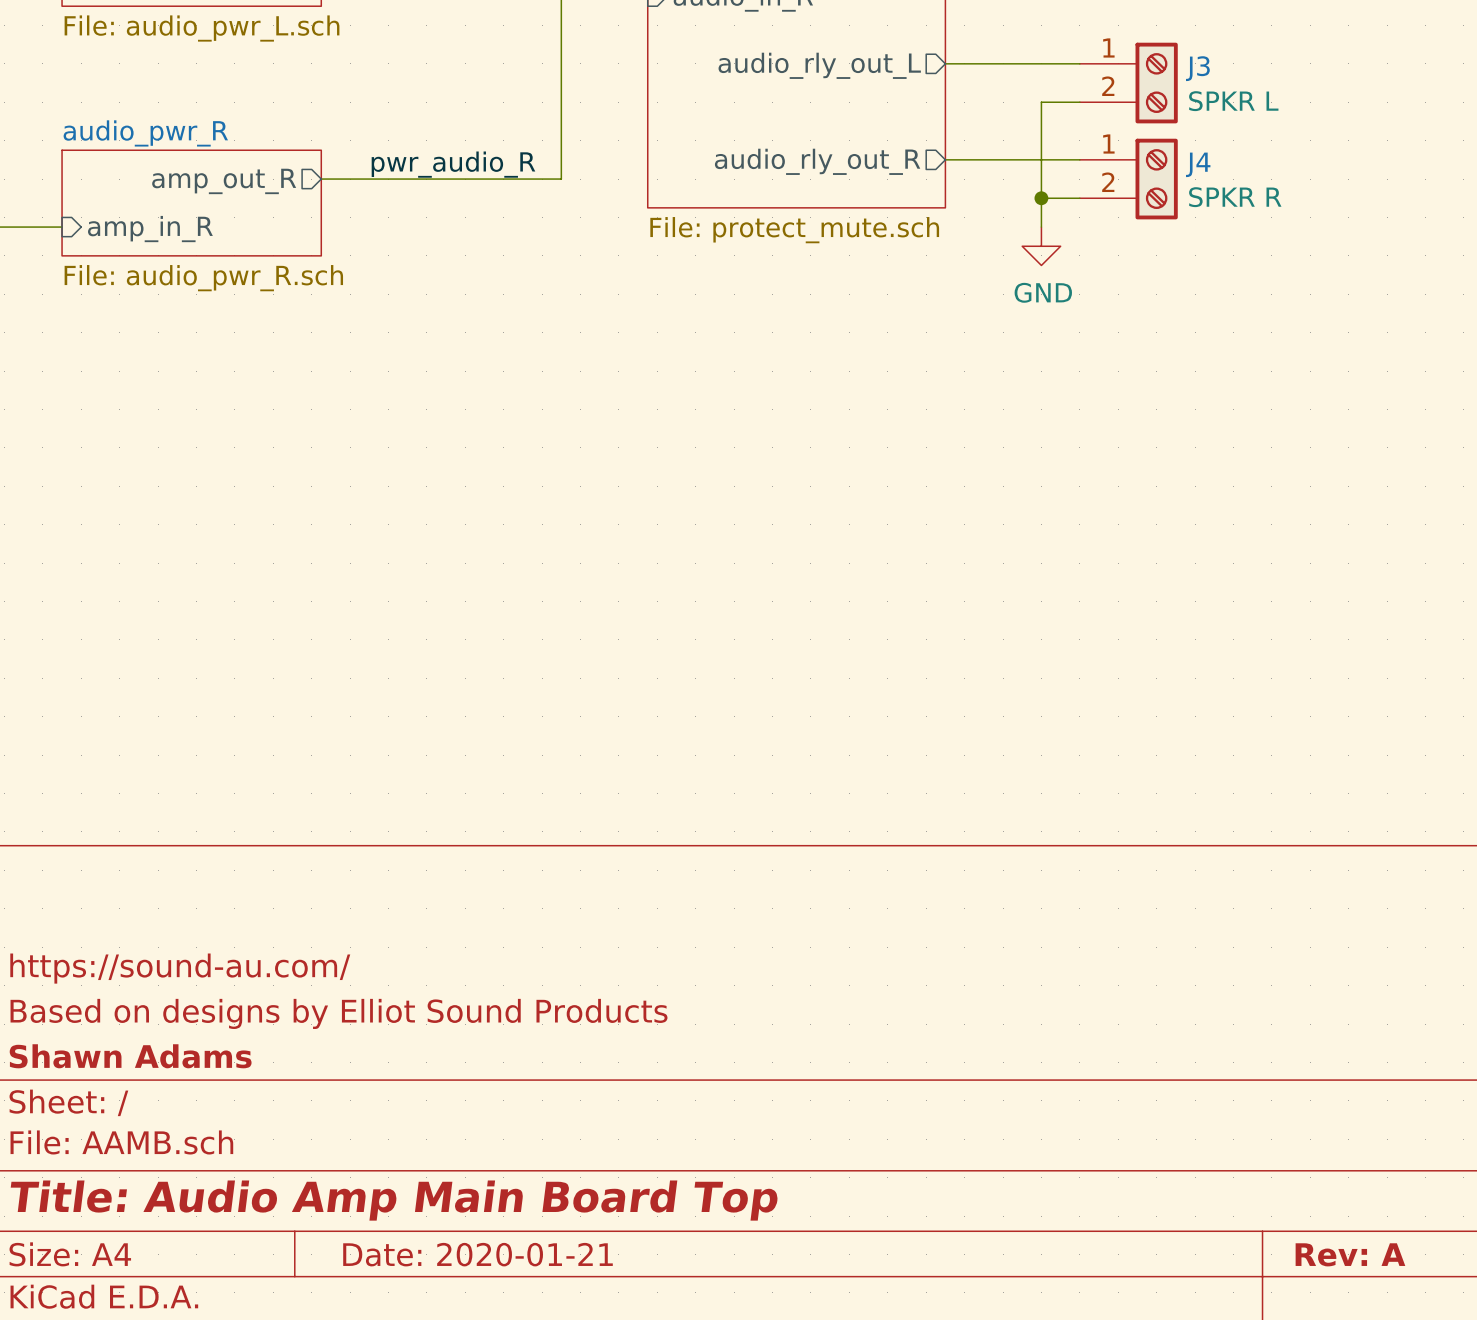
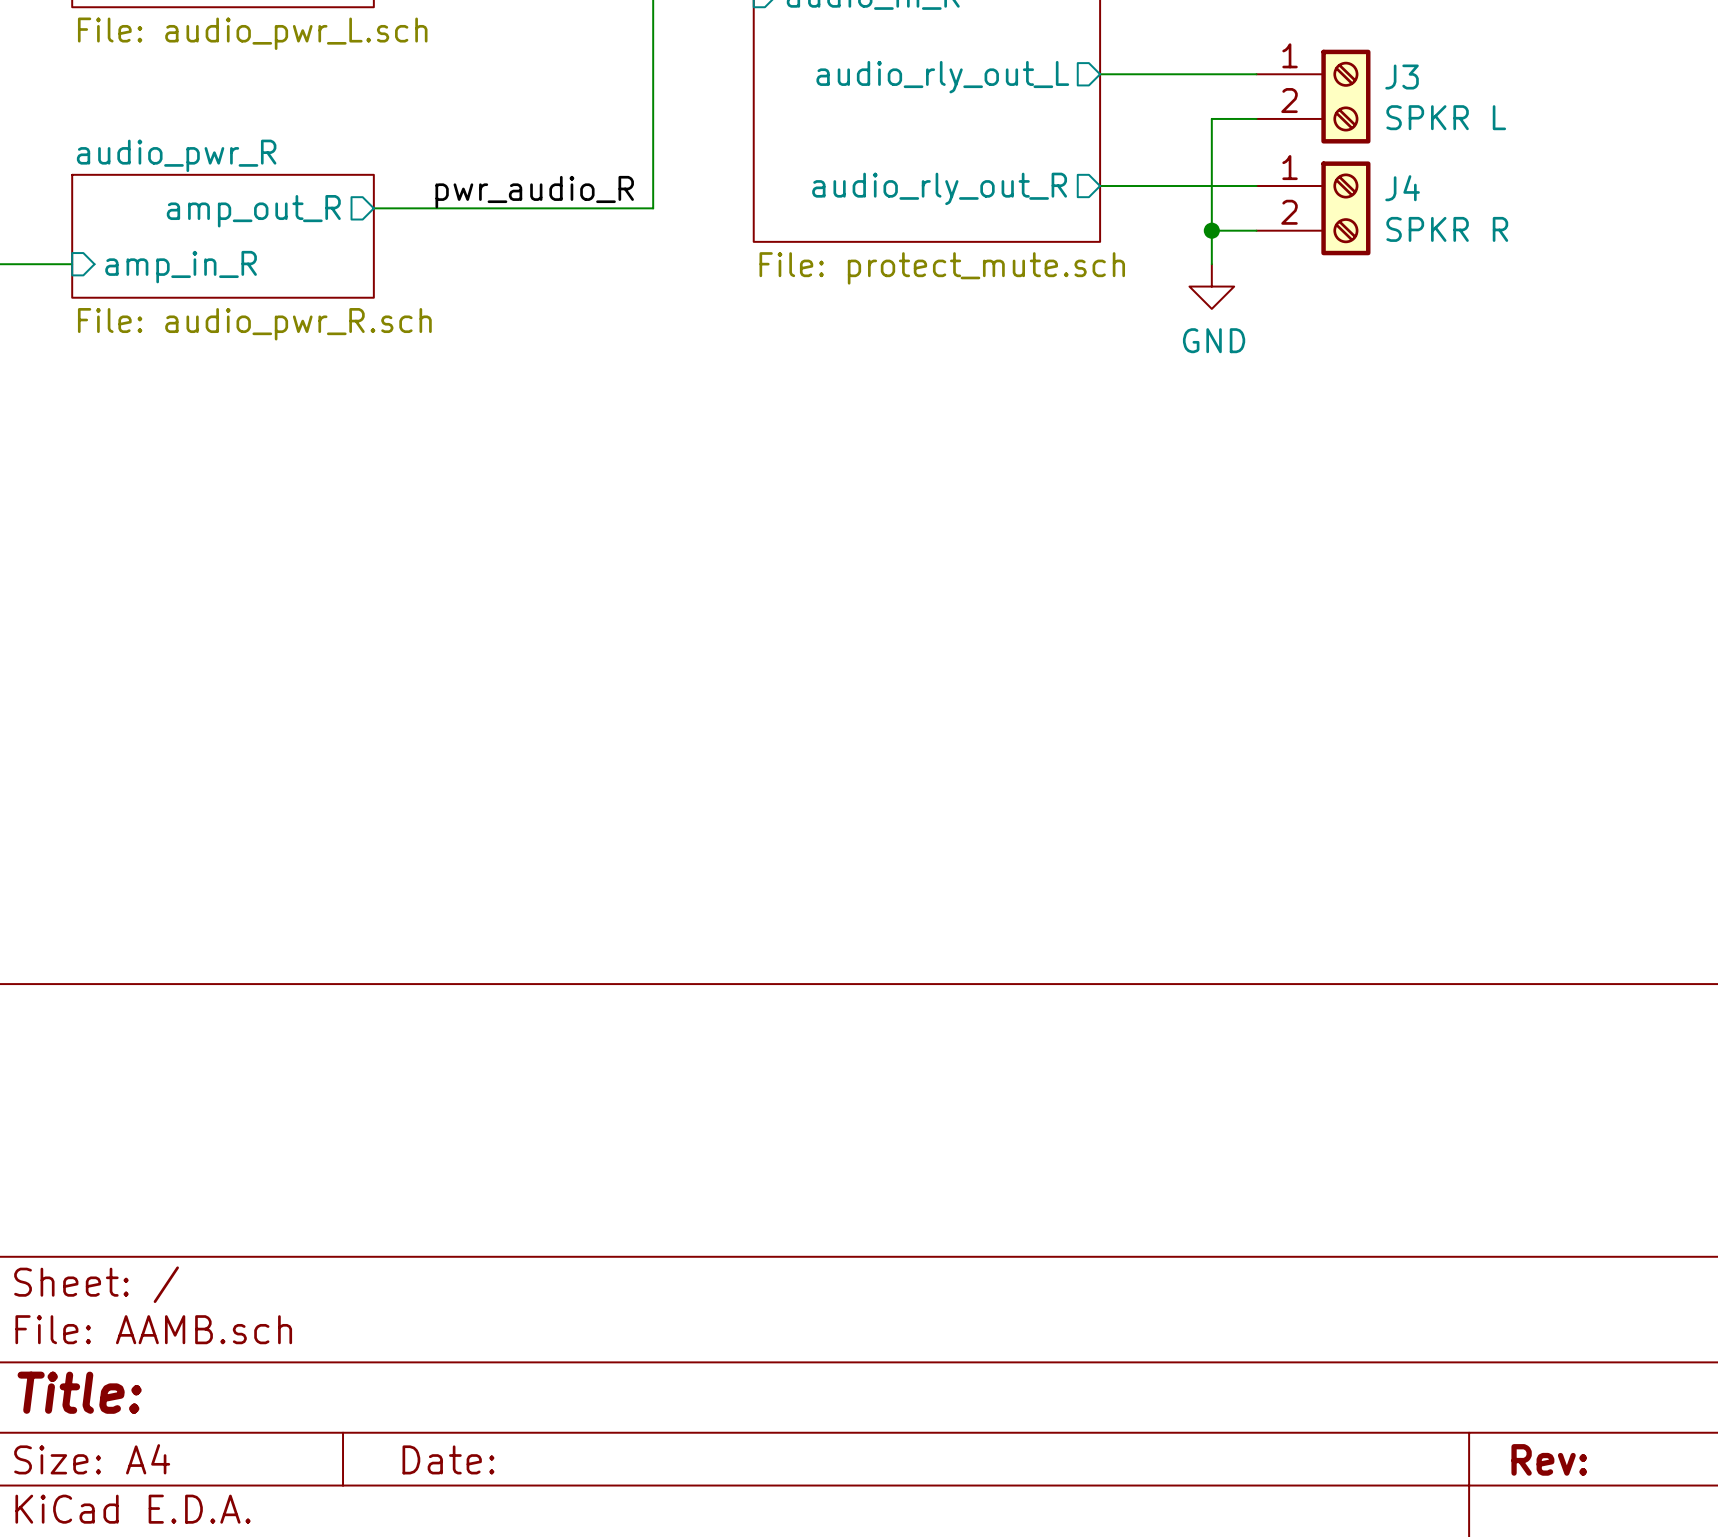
title block: https://sound-au.com/ (180, 968) -> none
title block: Based on designs by Elliot Sound Products (339, 1013) -> none
title block: Shawn Adams (130, 1056) -> none
title block: Title: Audio Amp Main Board Top (394, 1200) -> Title: (79, 1392)
title block: Date: 2020-01-21 (478, 1254) -> Date: (448, 1459)
title block: Rev: A (1350, 1254) -> Rev: (1549, 1459)

